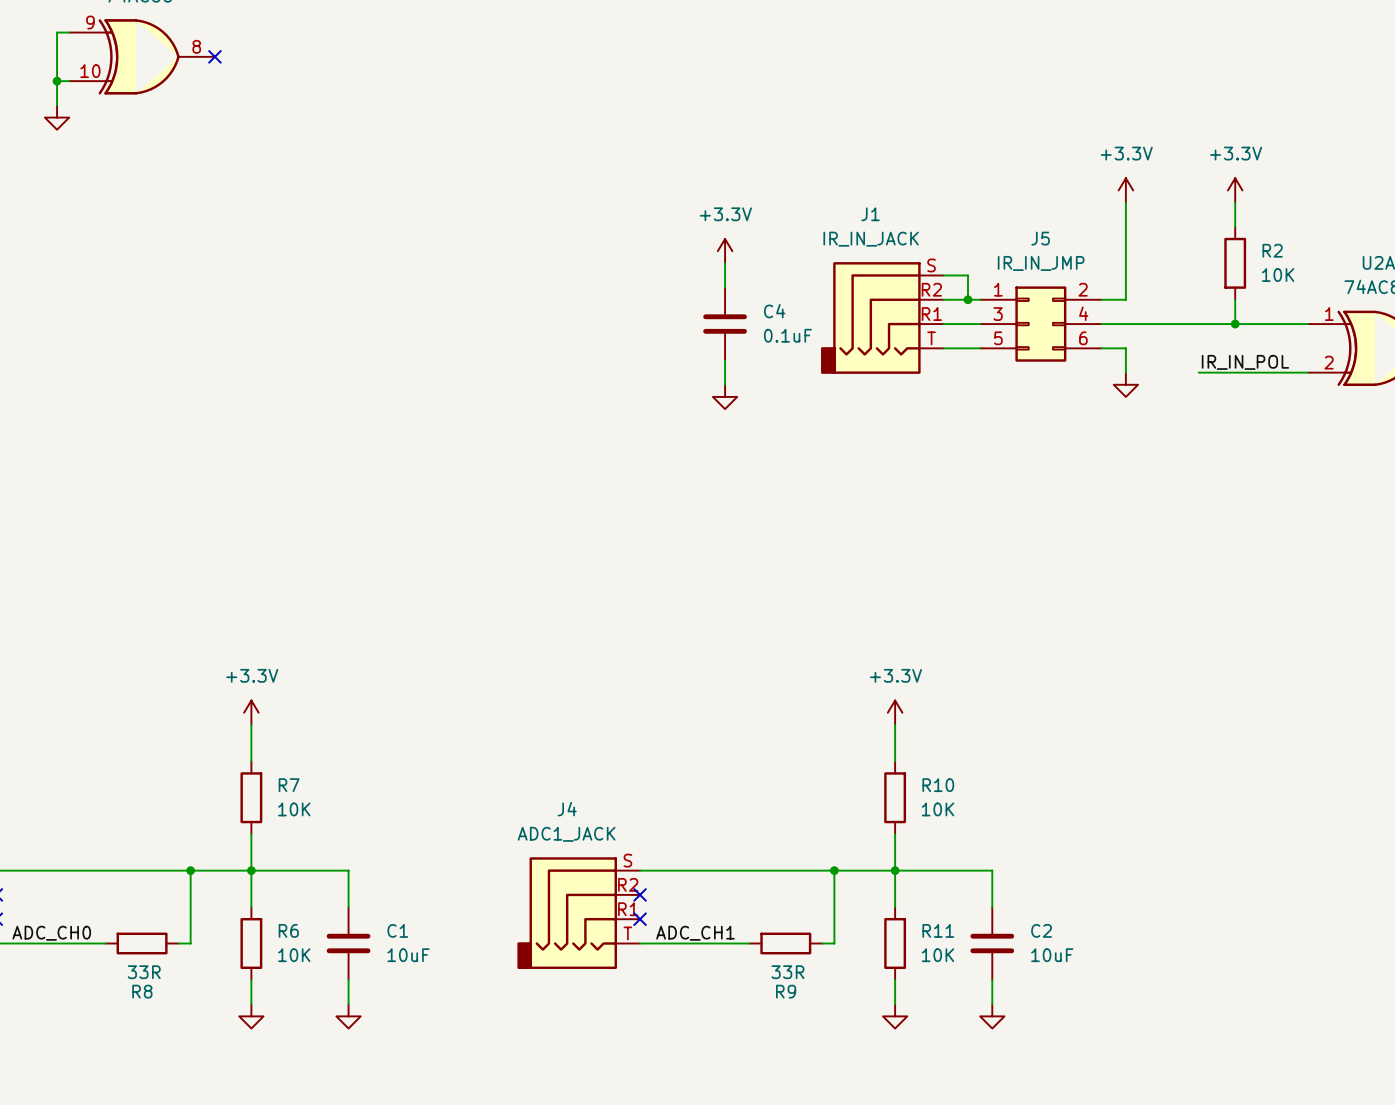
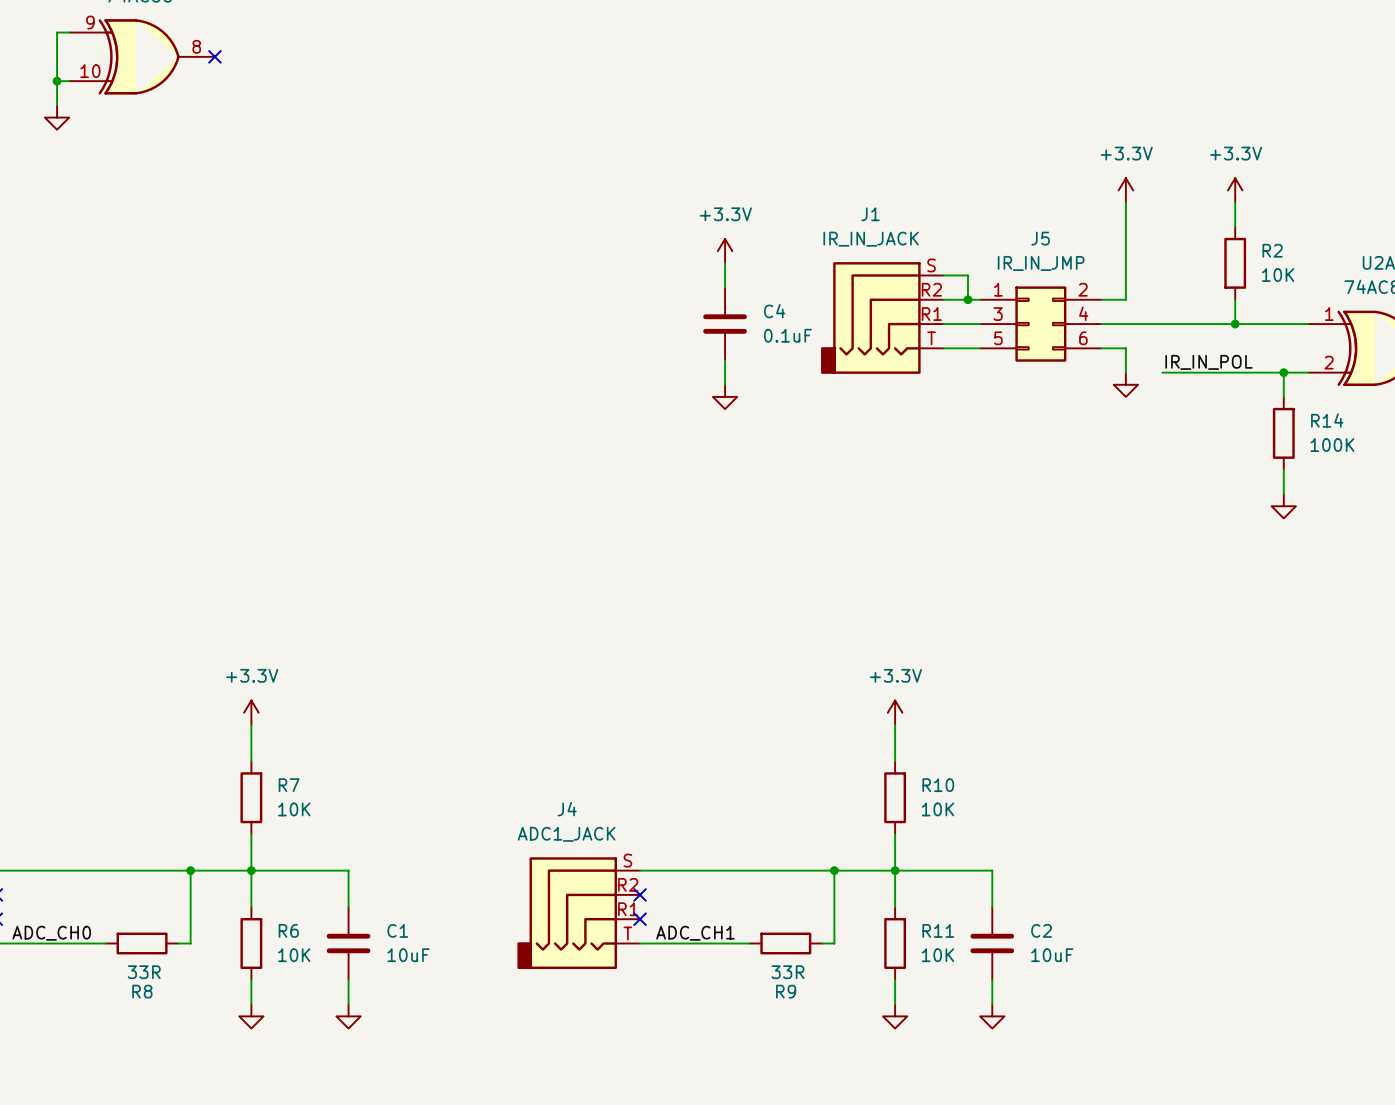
label position: IR_IN_POL (1245, 362) -> IR_IN_POL (1208, 362)
wire: none -> (1162, 372) (1198, 372)
wire: none -> (1283, 372) (1283, 396)
junction: none -> (1283, 372)
R14: none -> 100K (1283, 433)
wire: none -> (1283, 469) (1283, 494)
power symbol: none -> (1283, 506)

